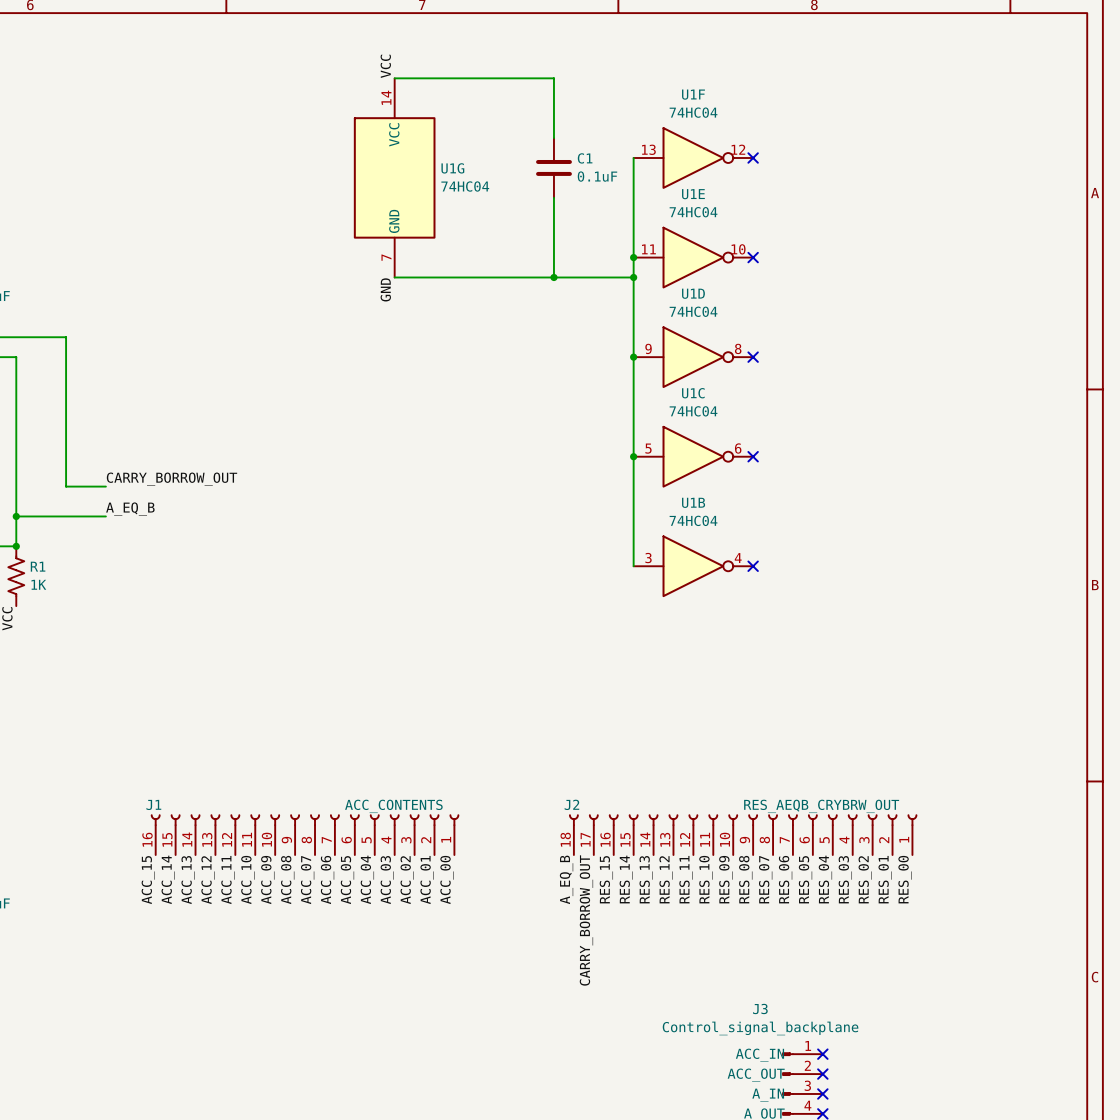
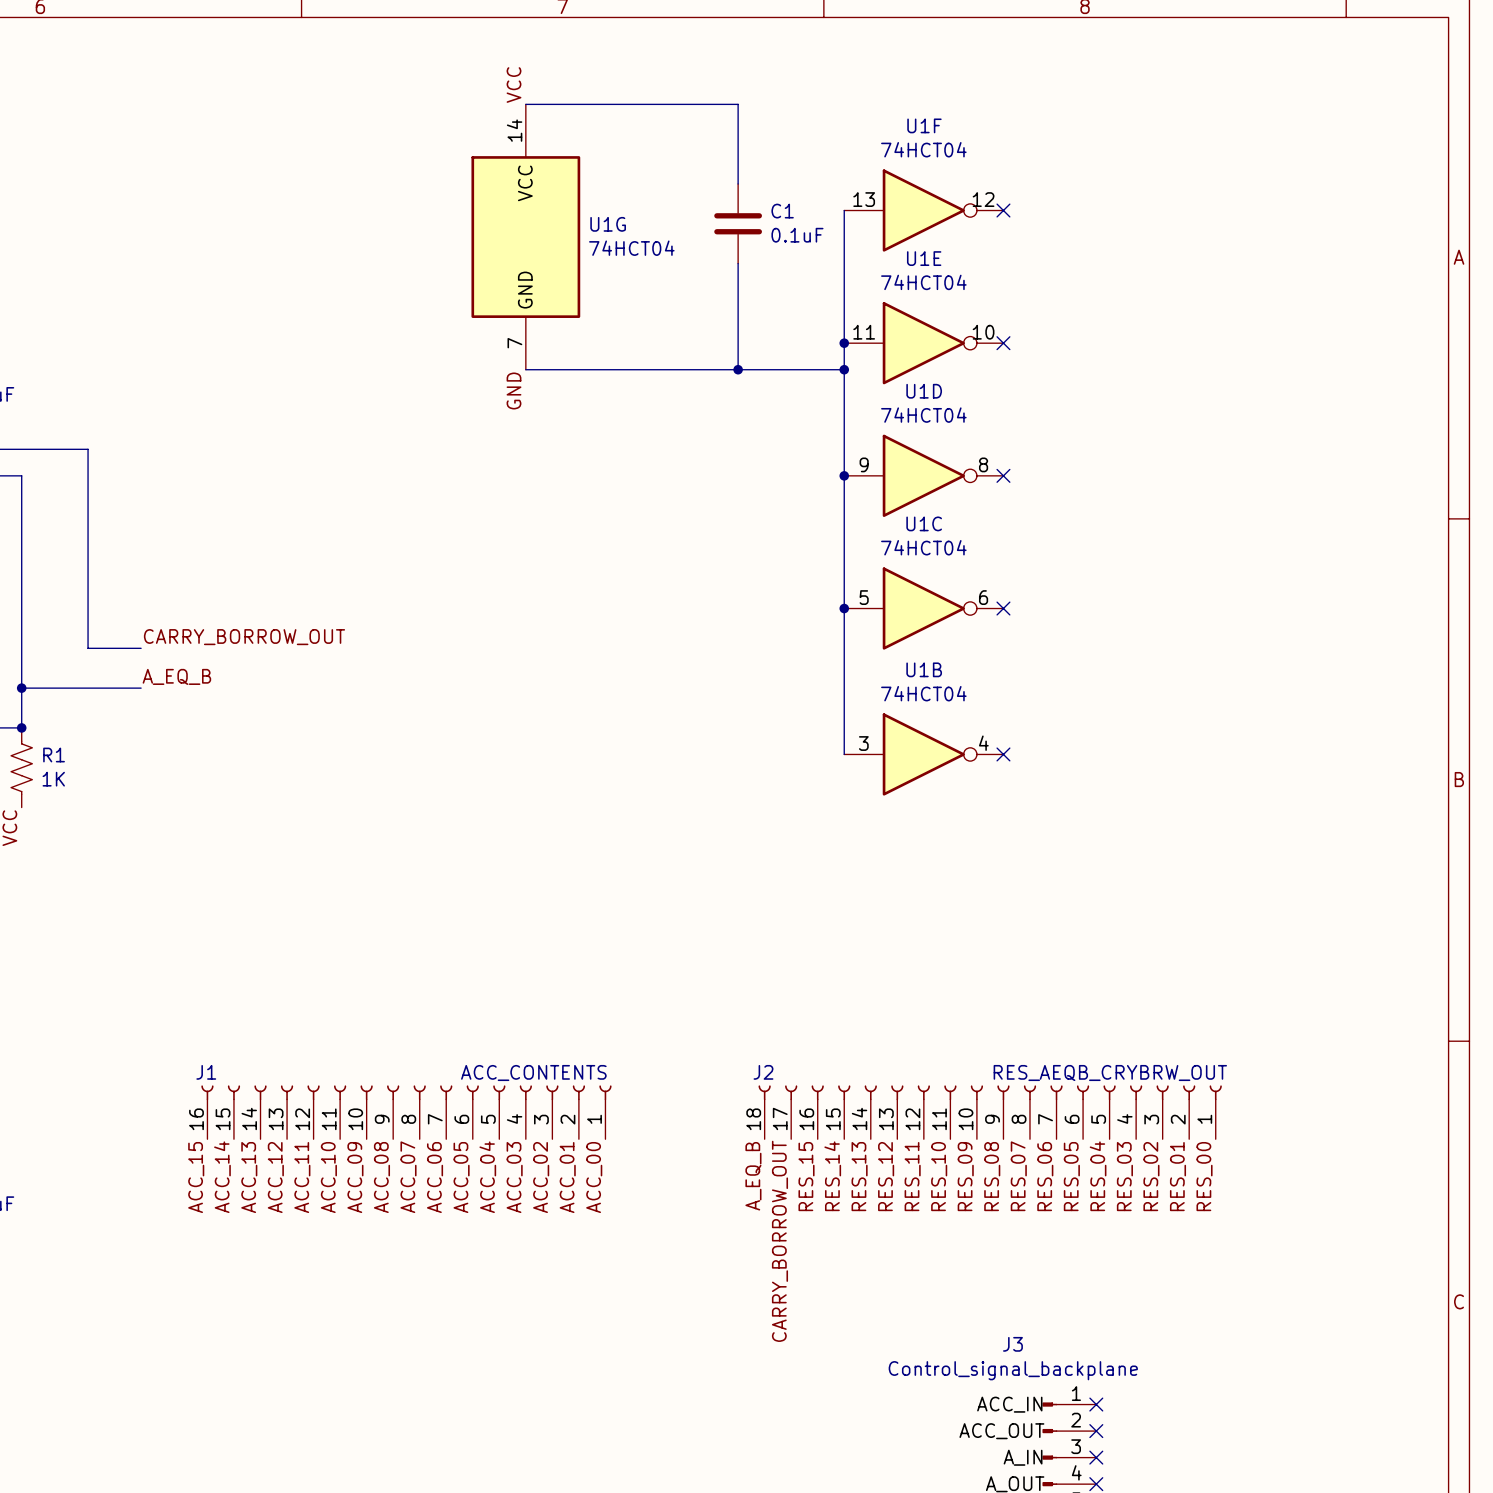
U1F value: 74HC04 (693, 112) -> 74HCT04 (923, 149)
U1G value: 74HC04 (465, 186) -> 74HCT04 (631, 248)
U1E value: 74HC04 (693, 212) -> 74HCT04 (923, 282)
U1D value: 74HC04 (693, 311) -> 74HCT04 (923, 415)
U1C value: 74HC04 (693, 411) -> 74HCT04 (923, 547)
U1B value: 74HC04 (693, 520) -> 74HCT04 (923, 693)

